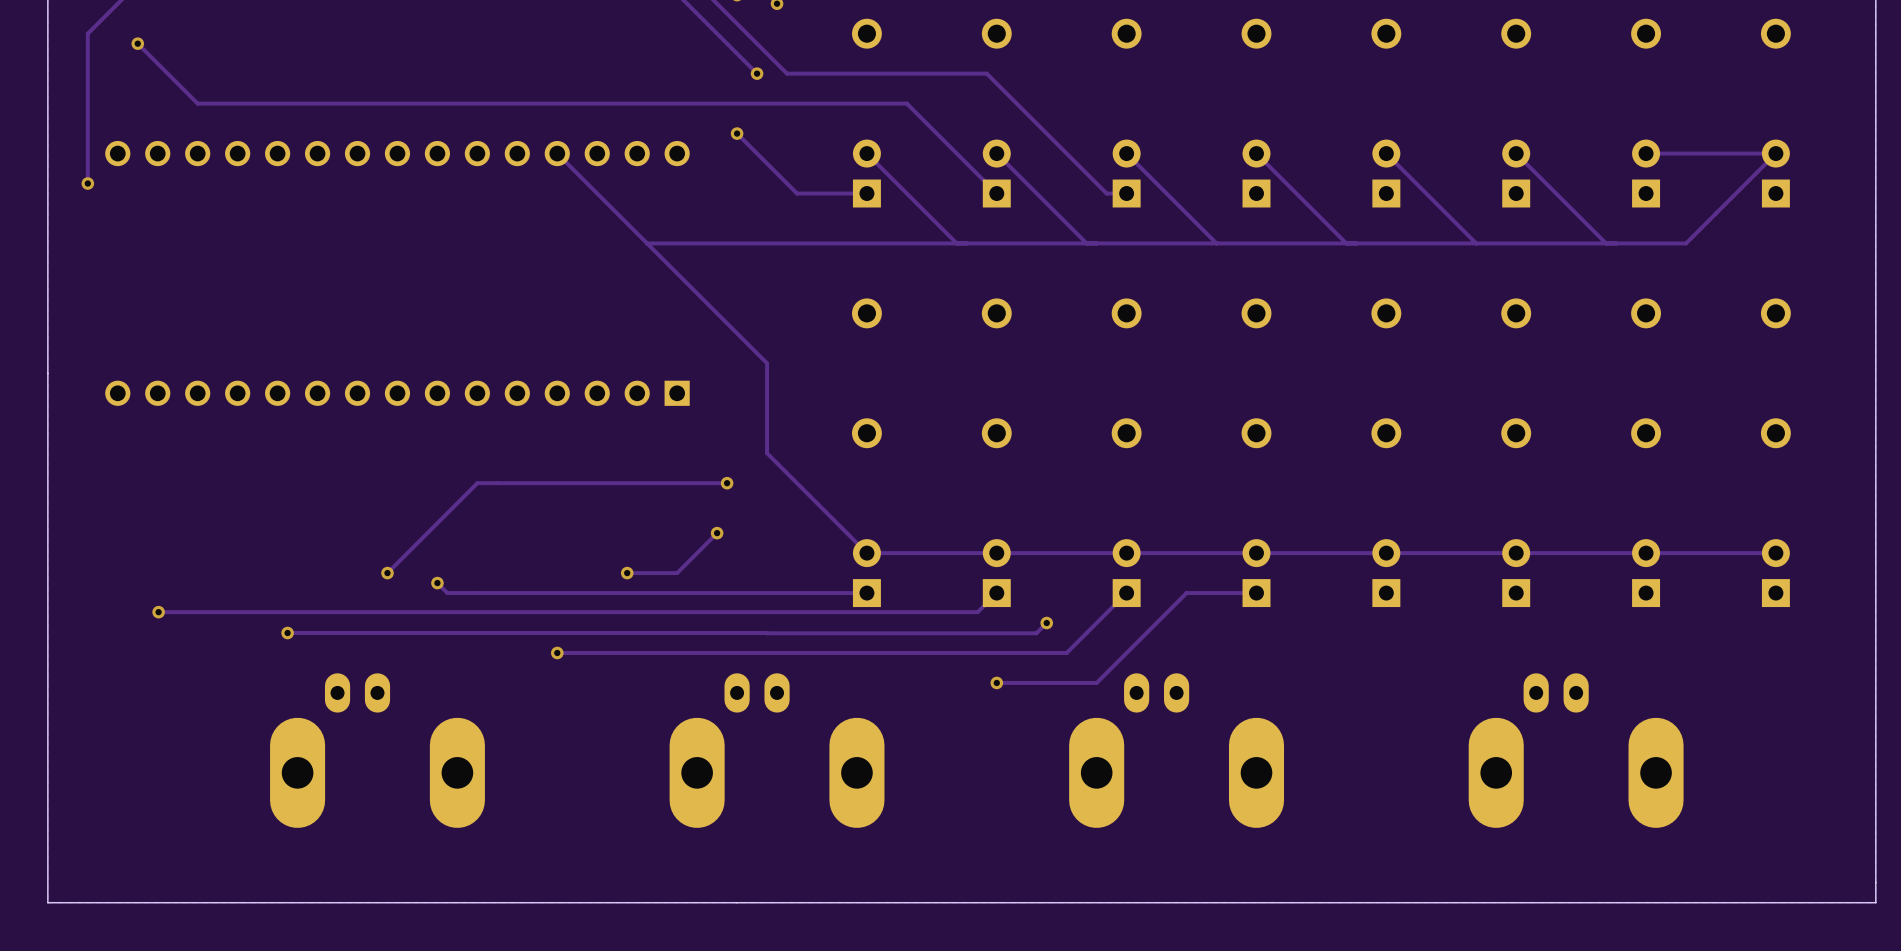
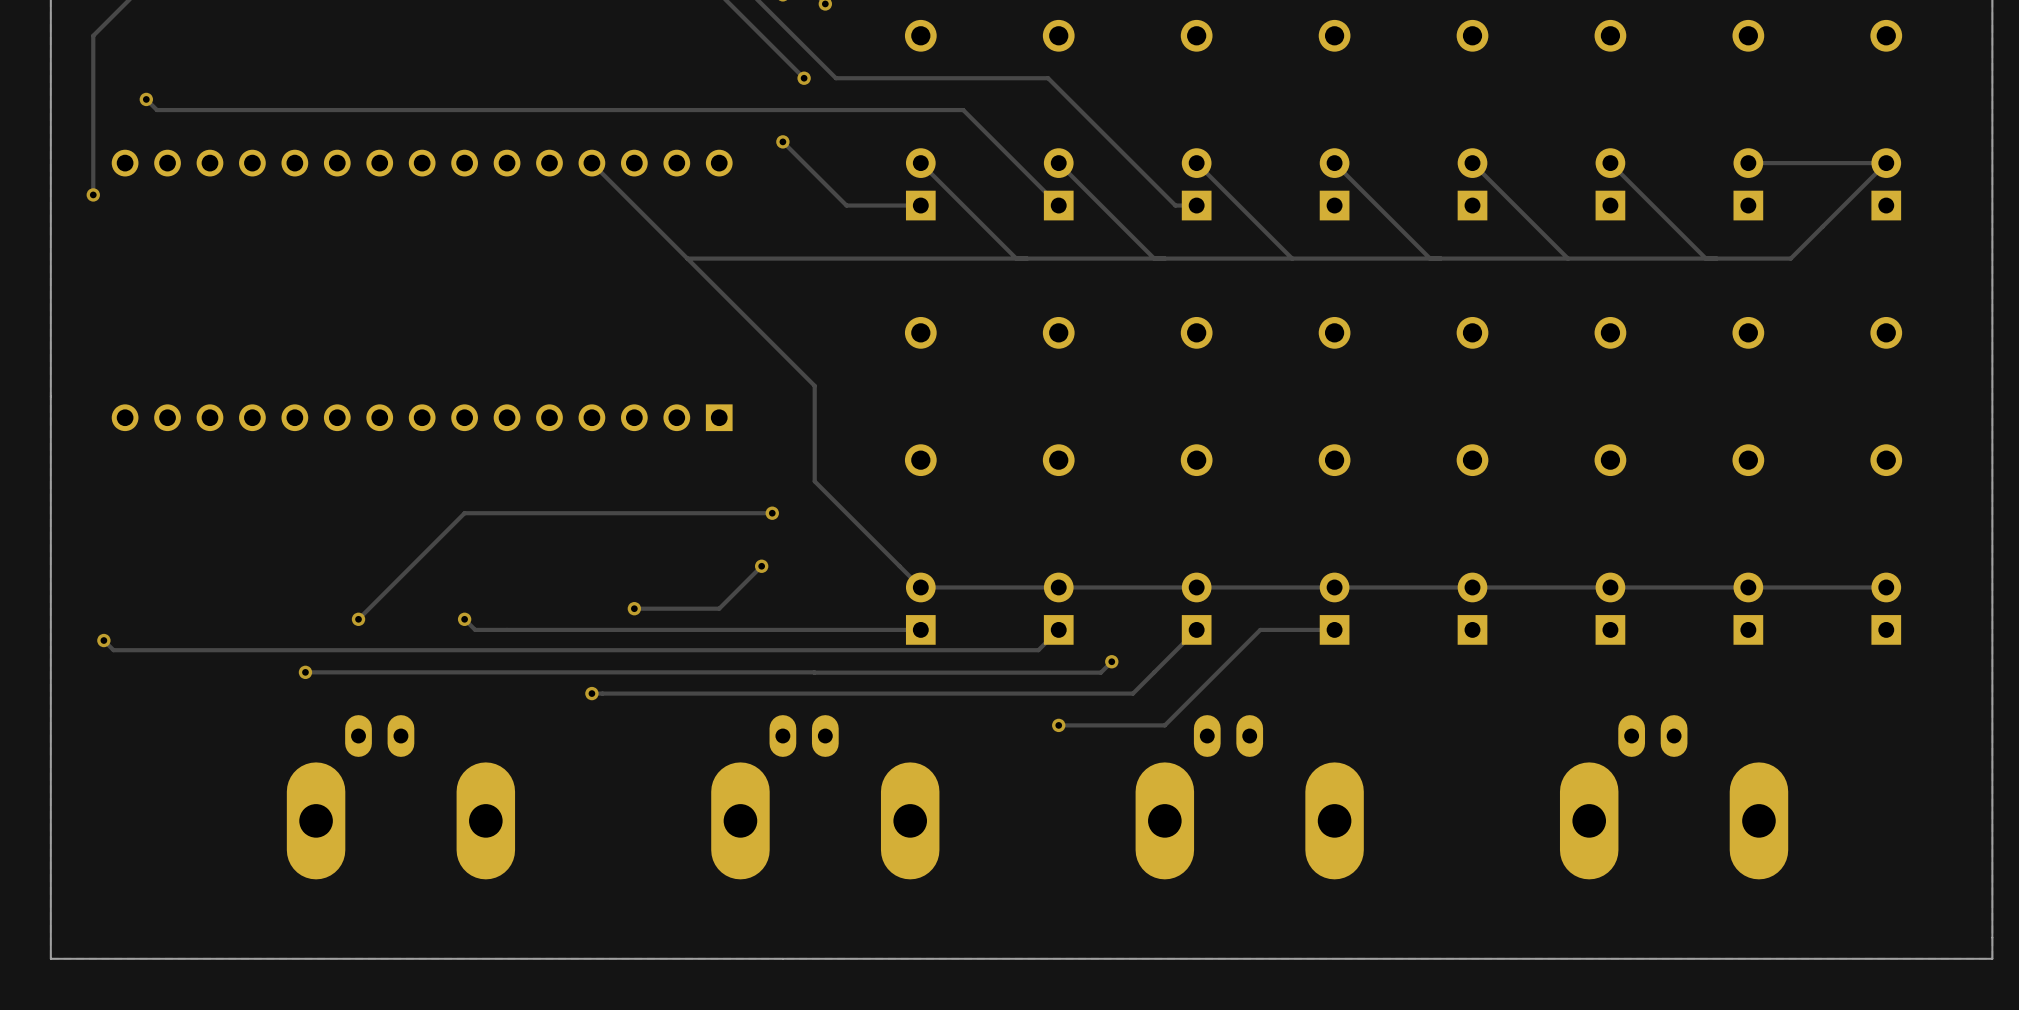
track: (137, 43) (197, 103) -> (146, 99) (156, 110) (209, 110)
via position: (137, 43) -> (146, 99)
track: (477, 483) (387, 573) -> (507, 513) (464, 513) (358, 619)
via position: (387, 573) -> (358, 619)
track: none -> (666, 608) (634, 608)
via position: (627, 573) -> (634, 608)
track: none -> (103, 640) (113, 650) (168, 650)
via position: (158, 612) -> (103, 640)

